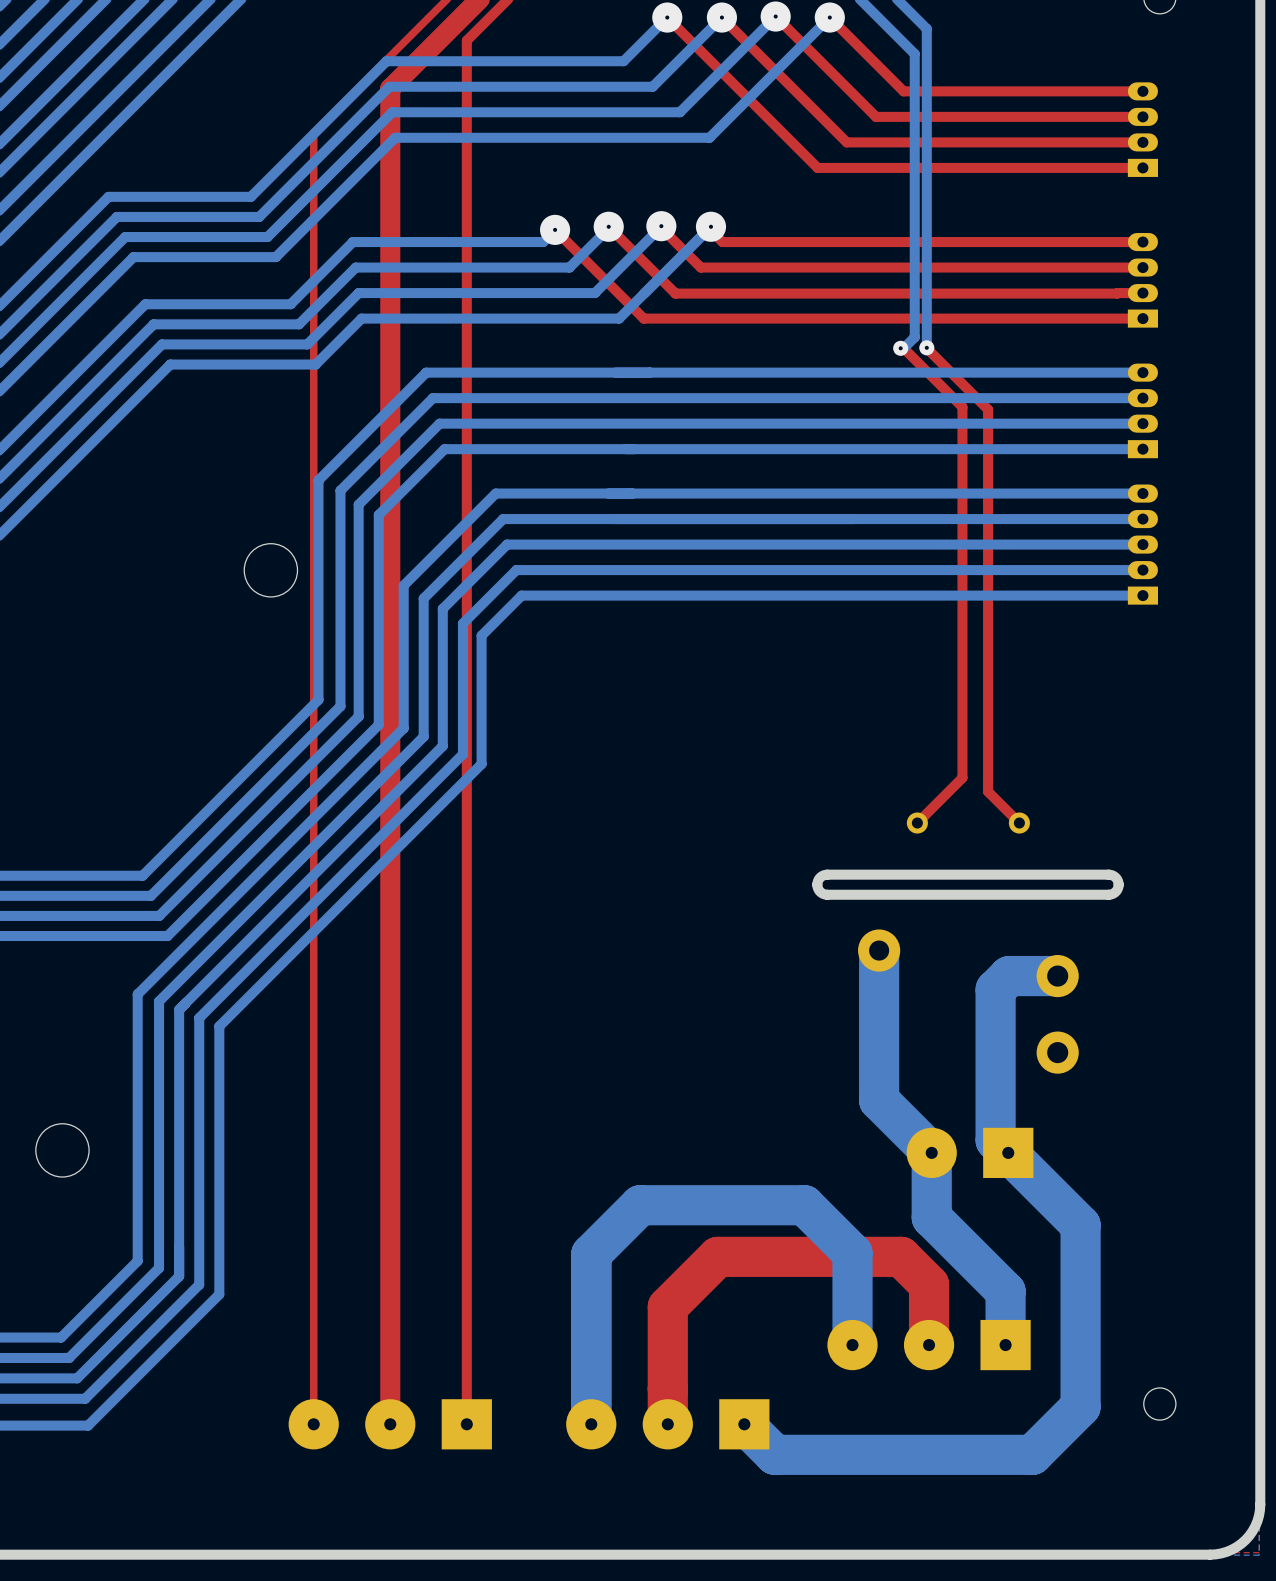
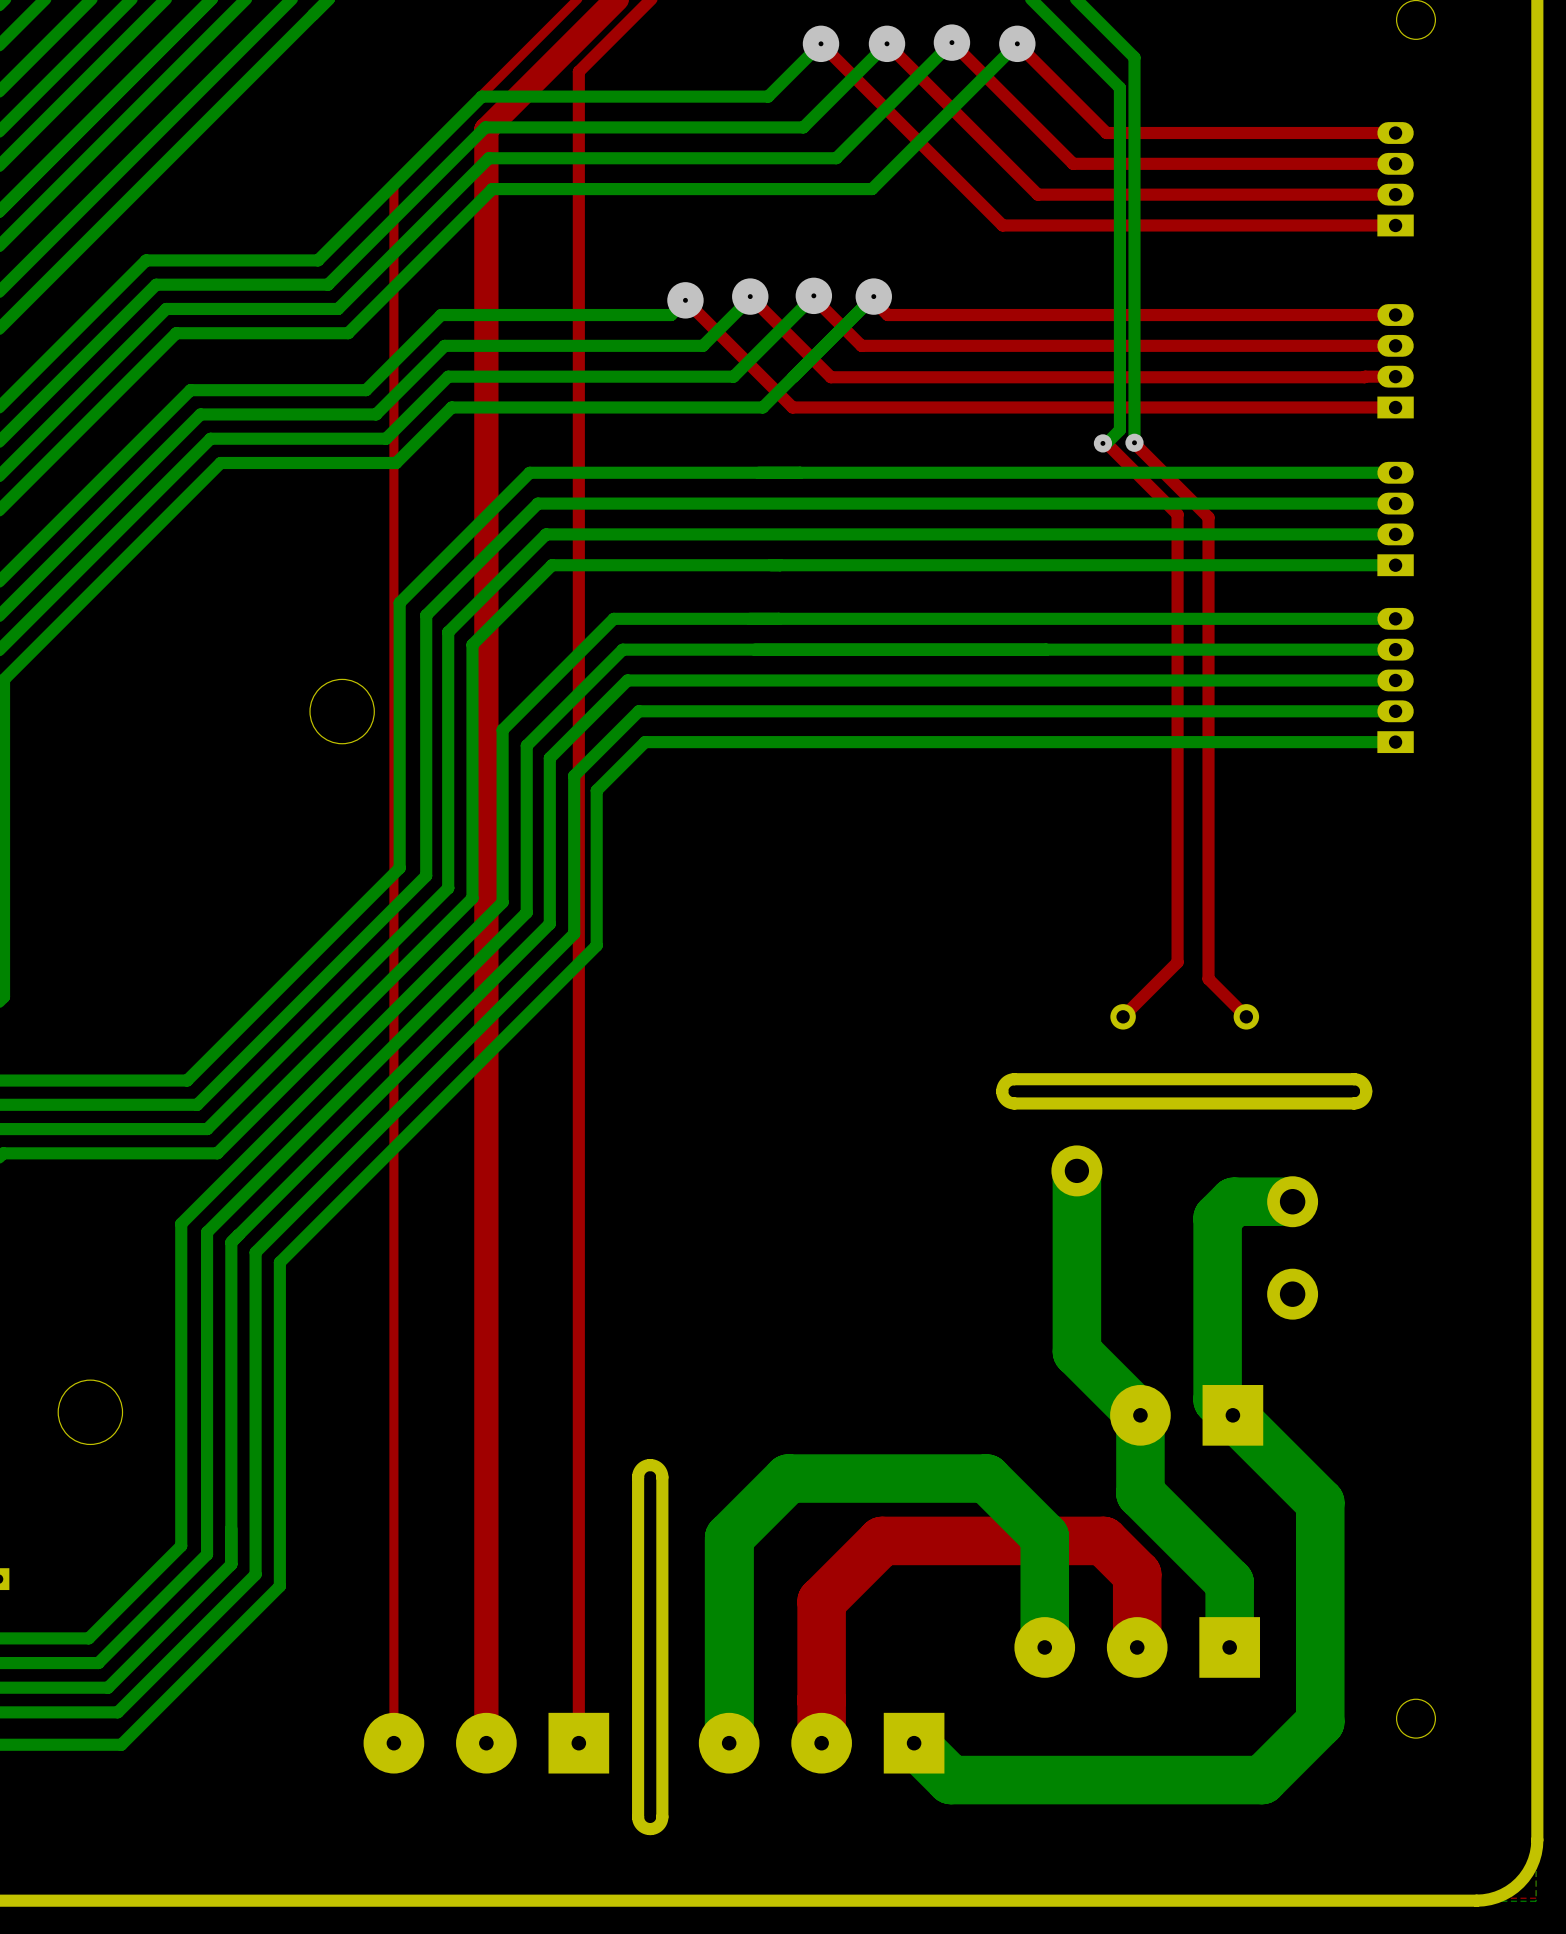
board edge: none -> (650, 1465) (641, 1468) (638, 1477) (638, 1816) (641, 1825) (650, 1829) (658, 1825) (662, 1816) (662, 1477) (658, 1468) (650, 1465)

